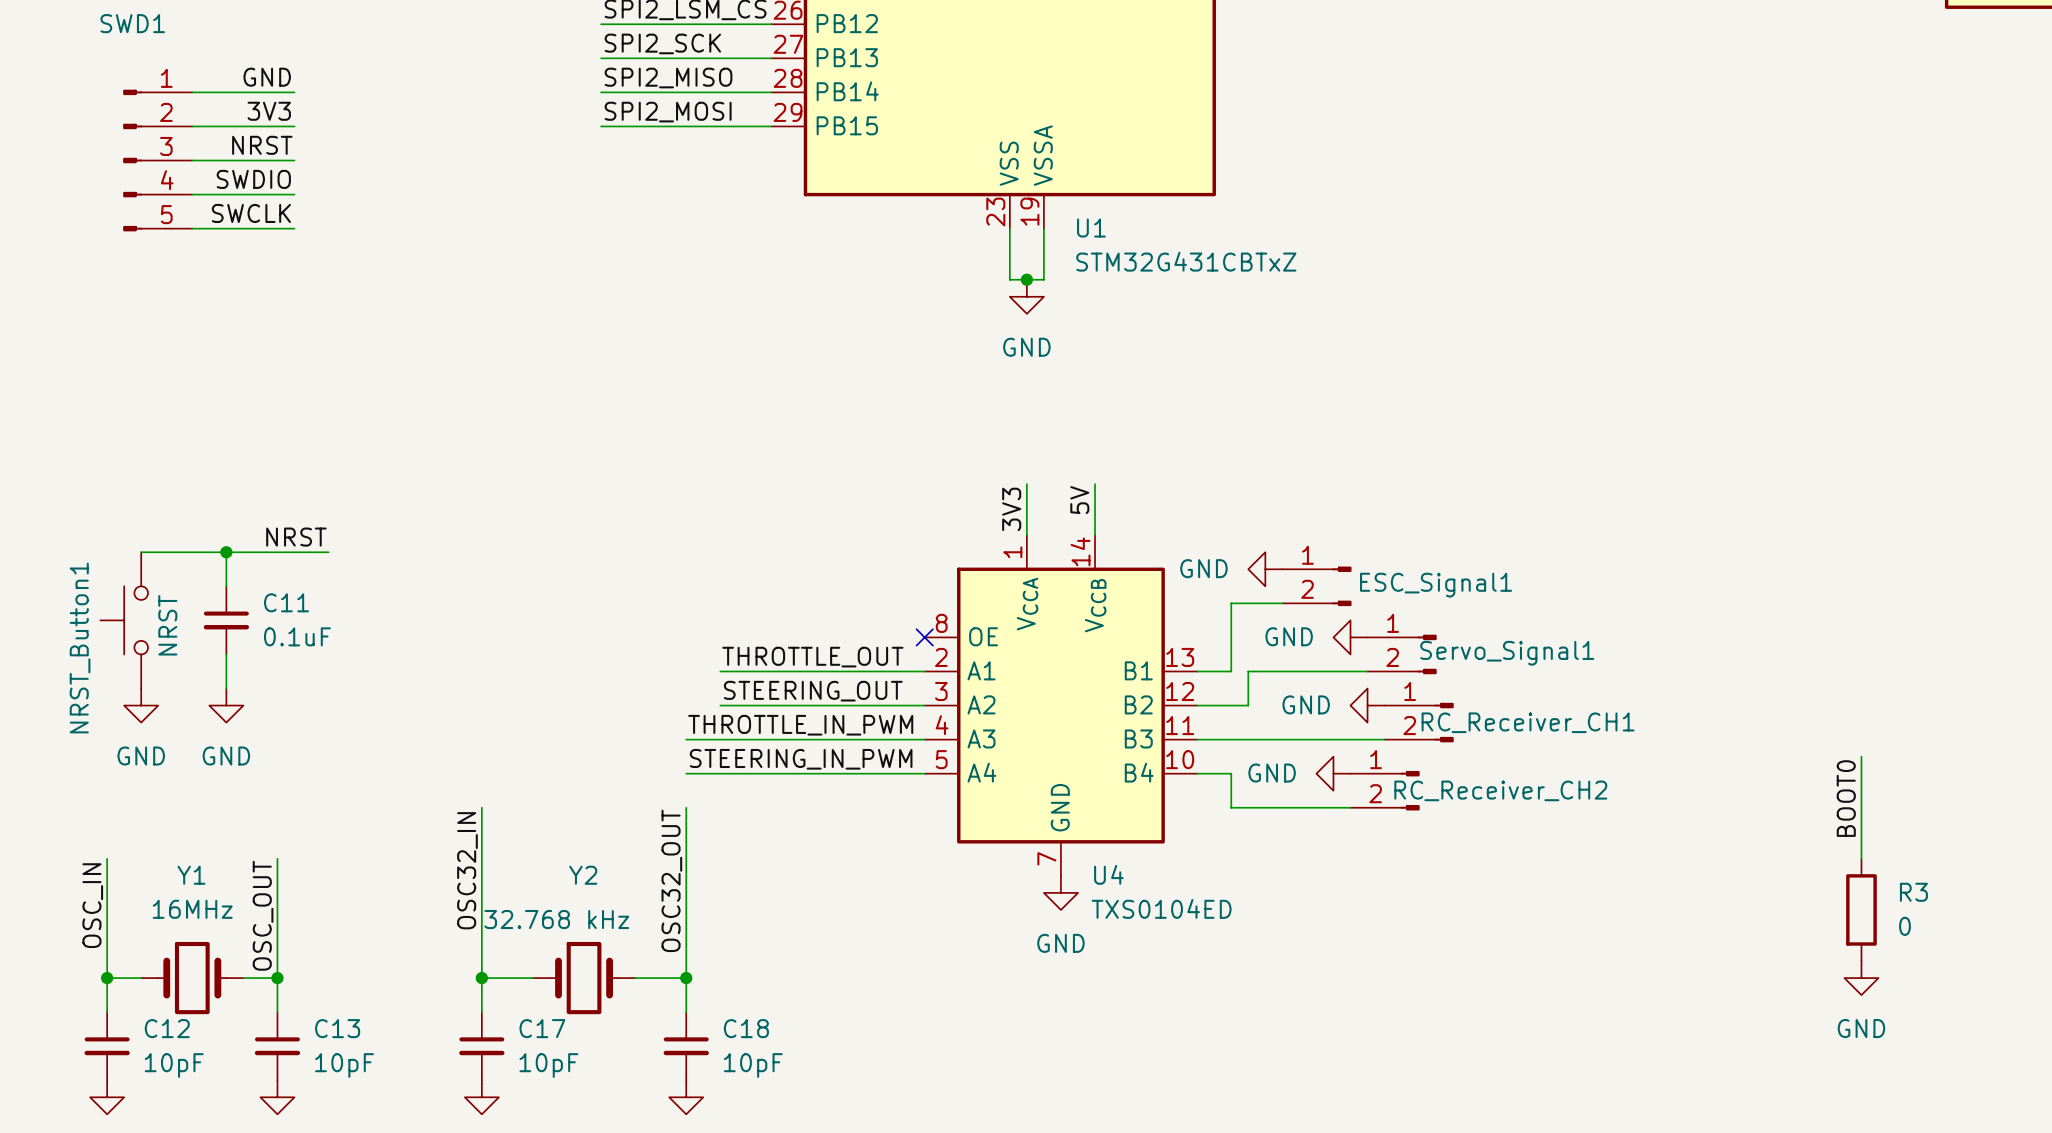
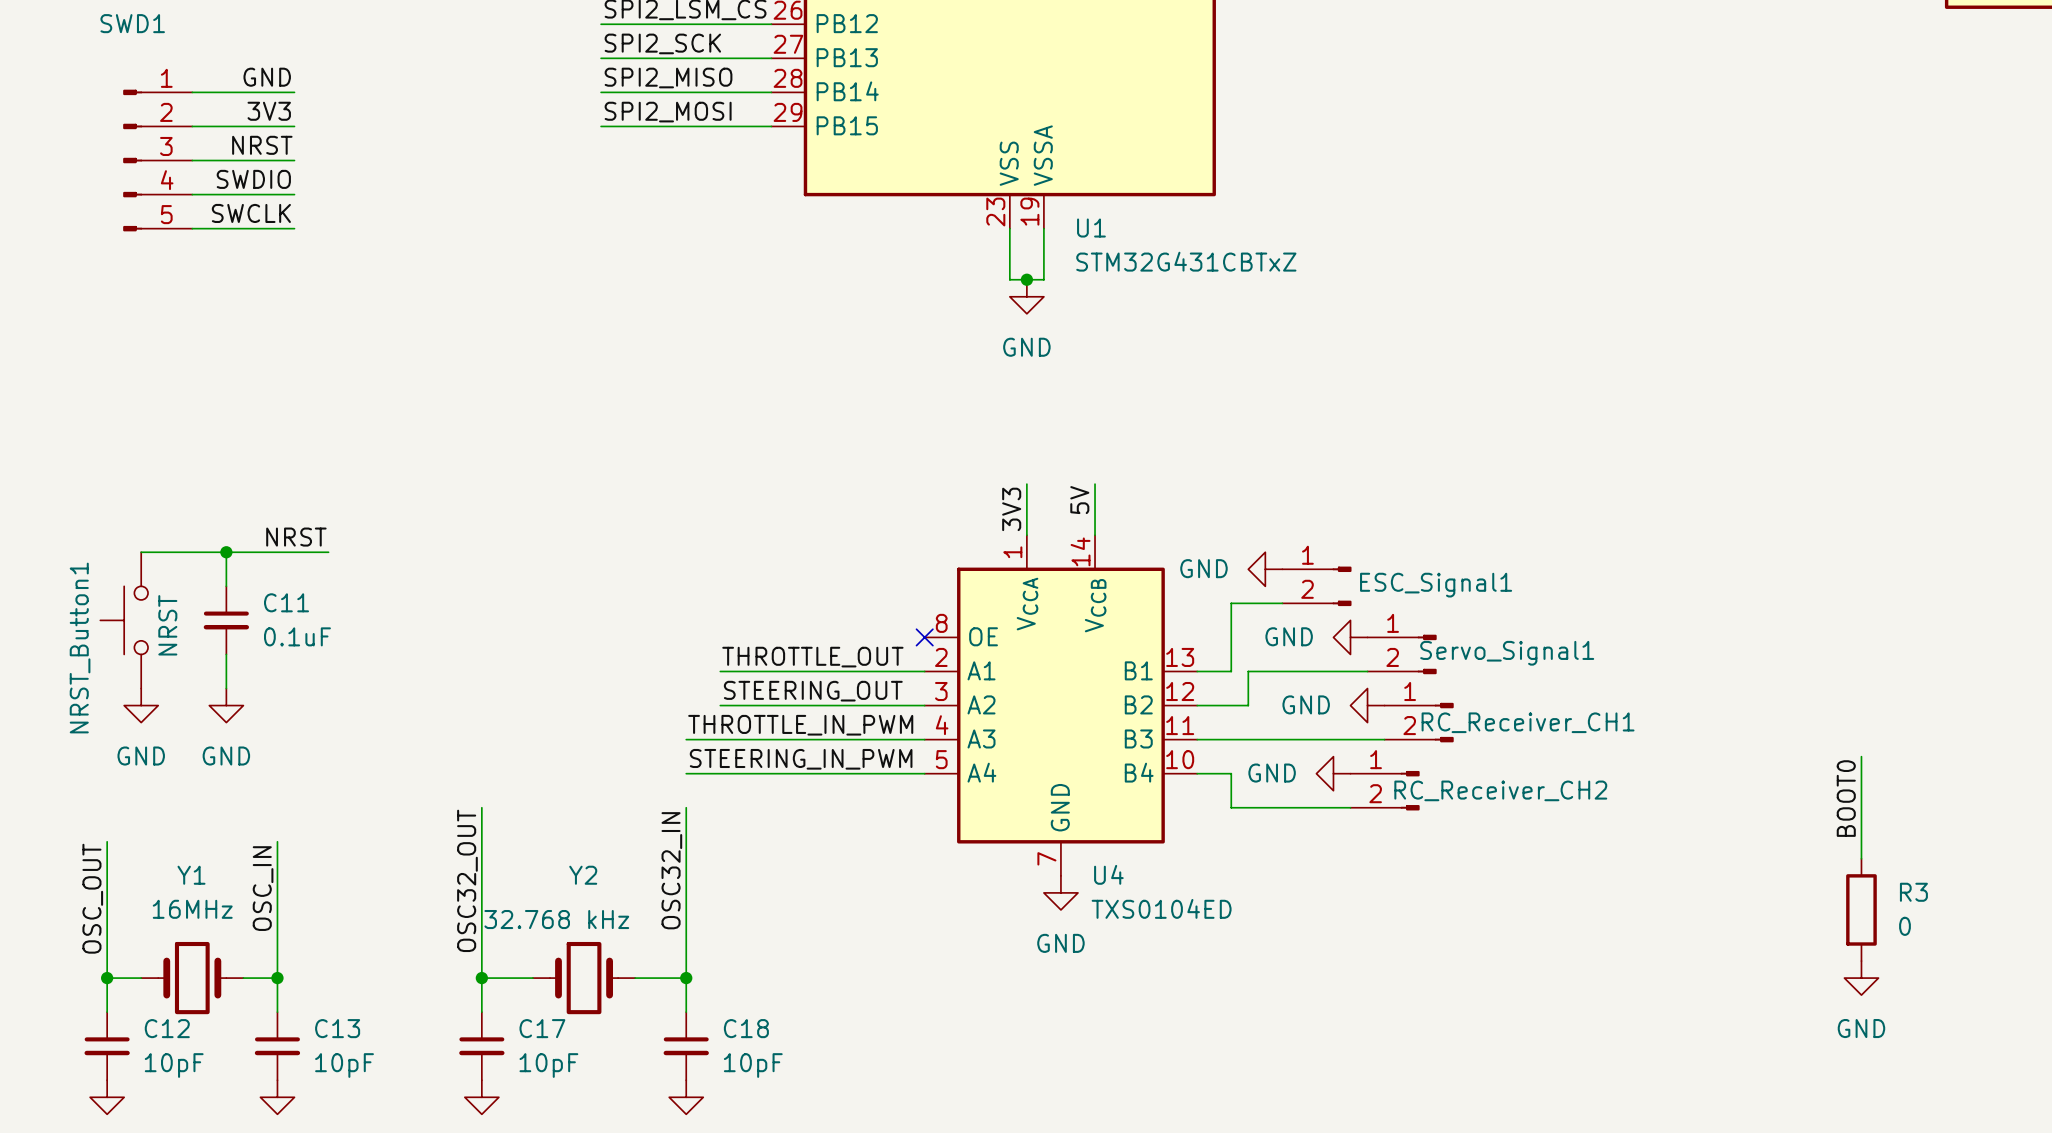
wire: none -> (107, 841) (107, 858)
wire: none -> (277, 841) (277, 858)
label: OSC32_IN (467, 870) -> OSC32_OUT (467, 880)
label: OSC32_OUT (671, 880) -> OSC32_IN (671, 870)
label position: OSC_IN (92, 905) -> OSC_IN (263, 888)
label position: OSC_OUT (263, 915) -> OSC_OUT (92, 898)

